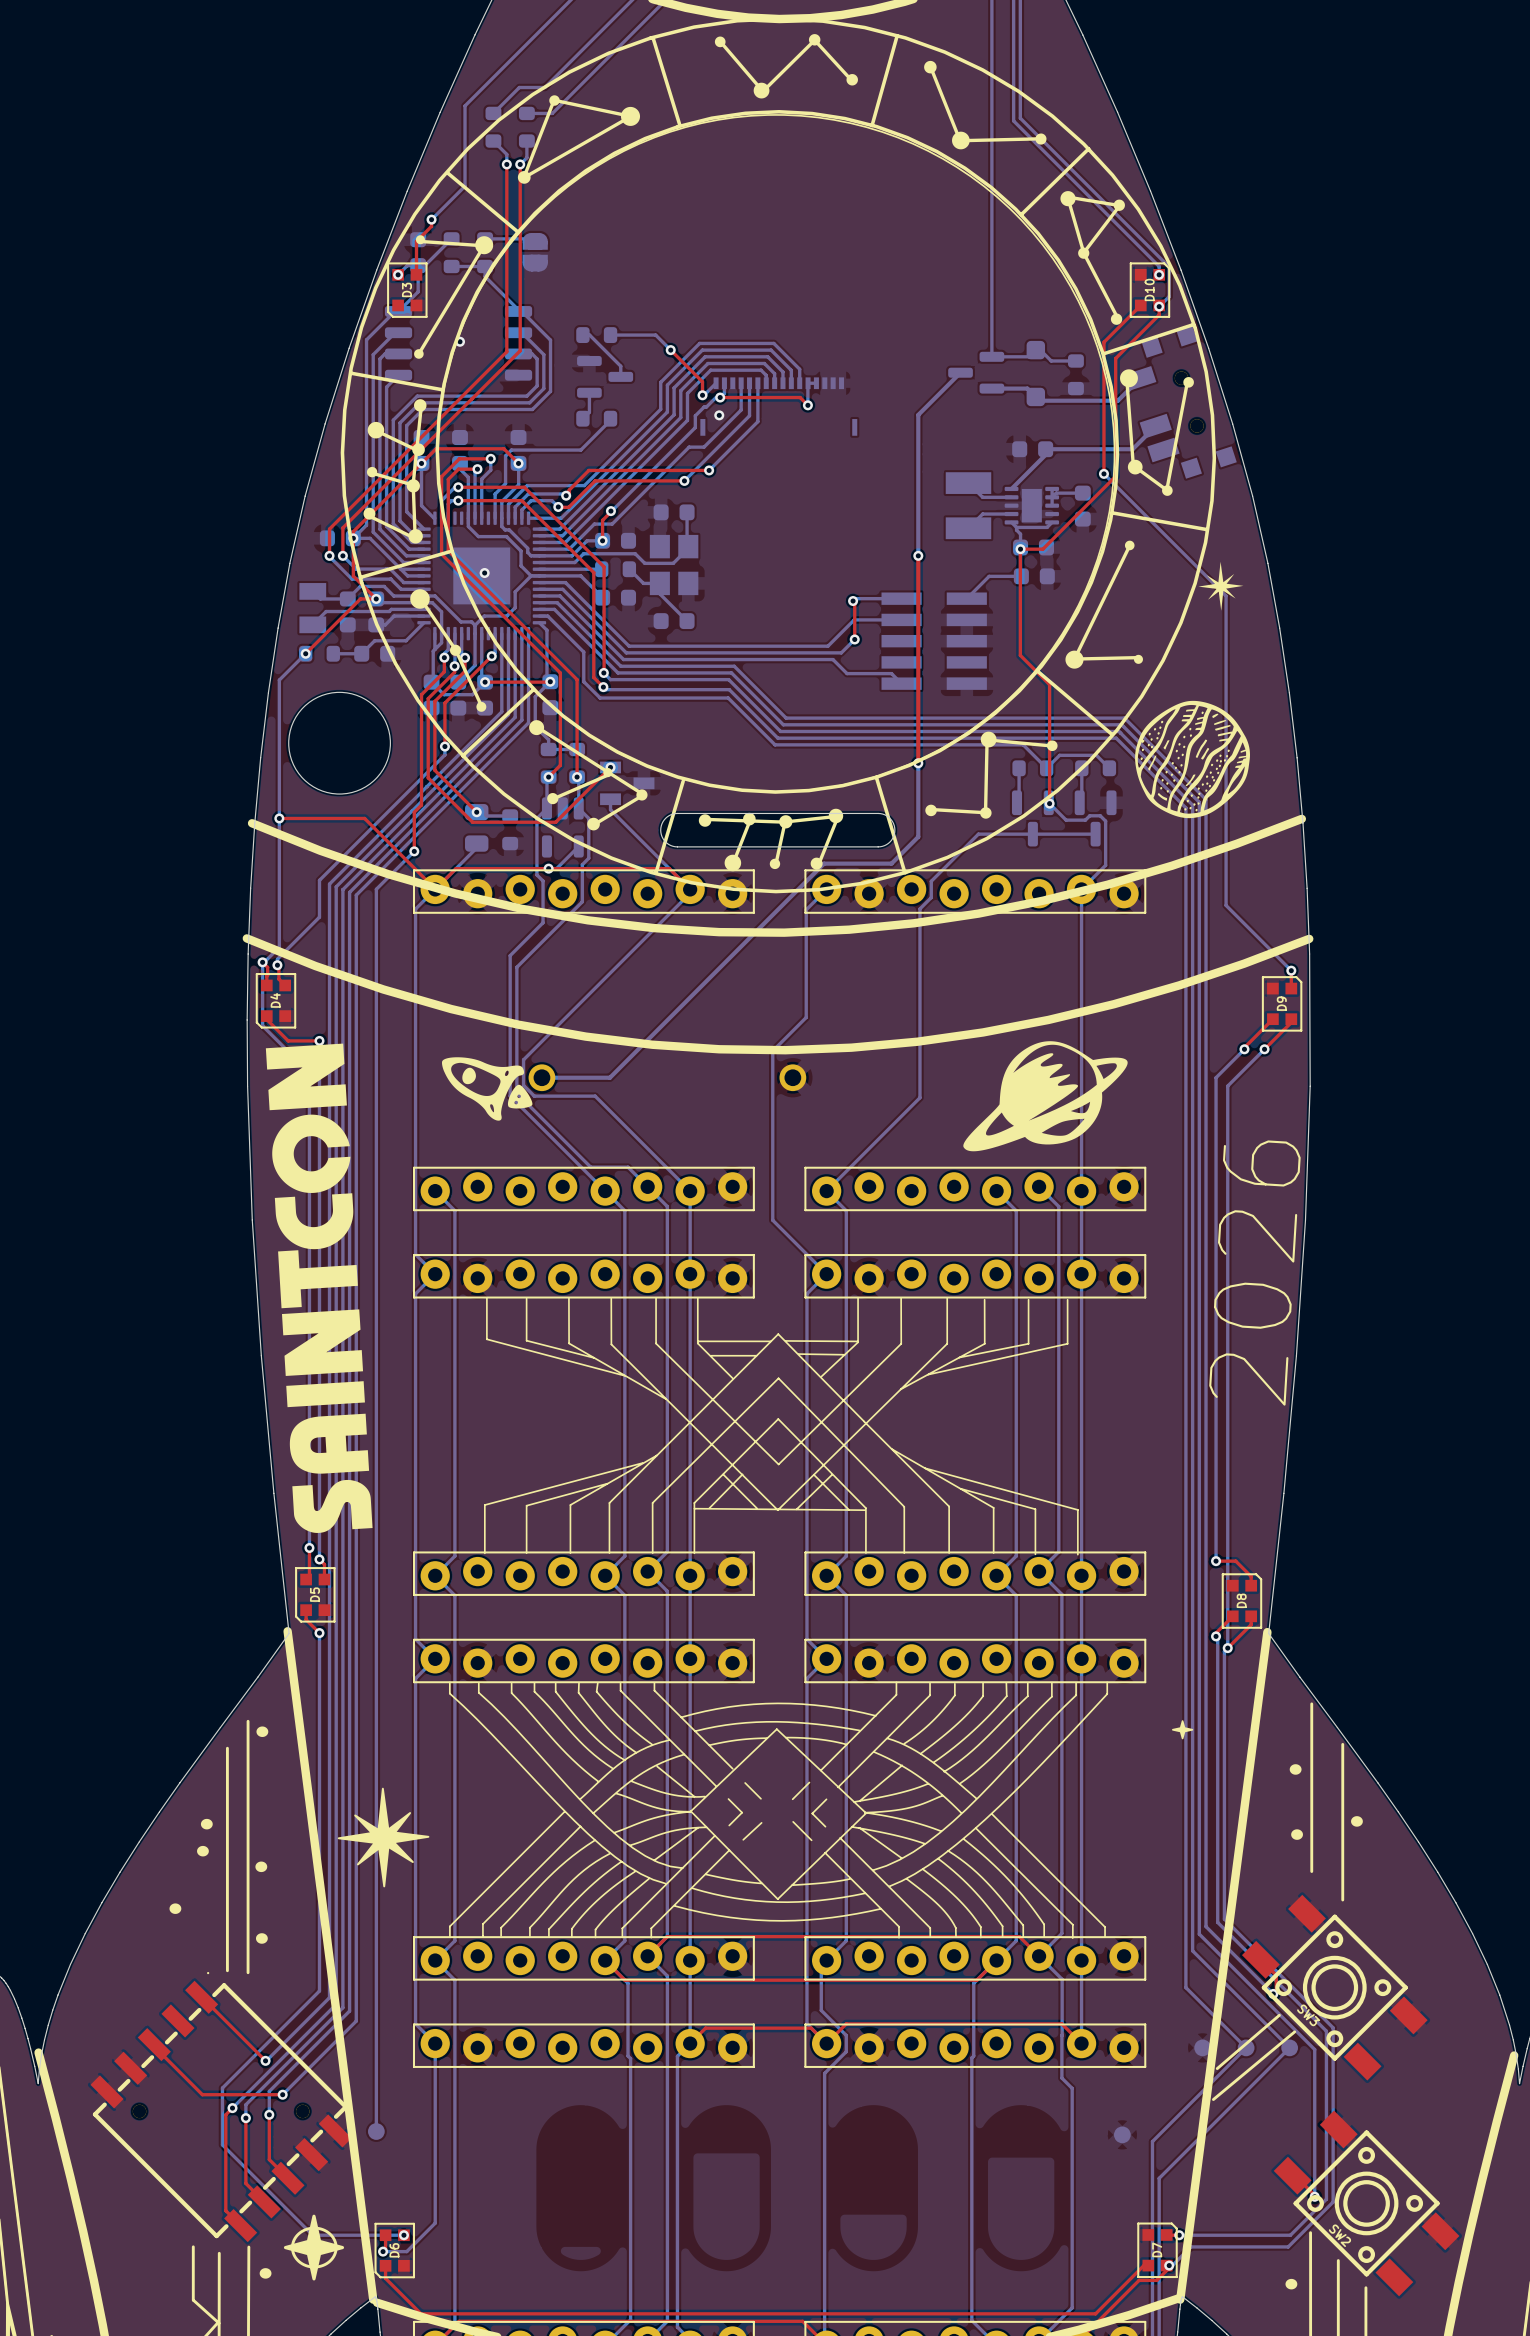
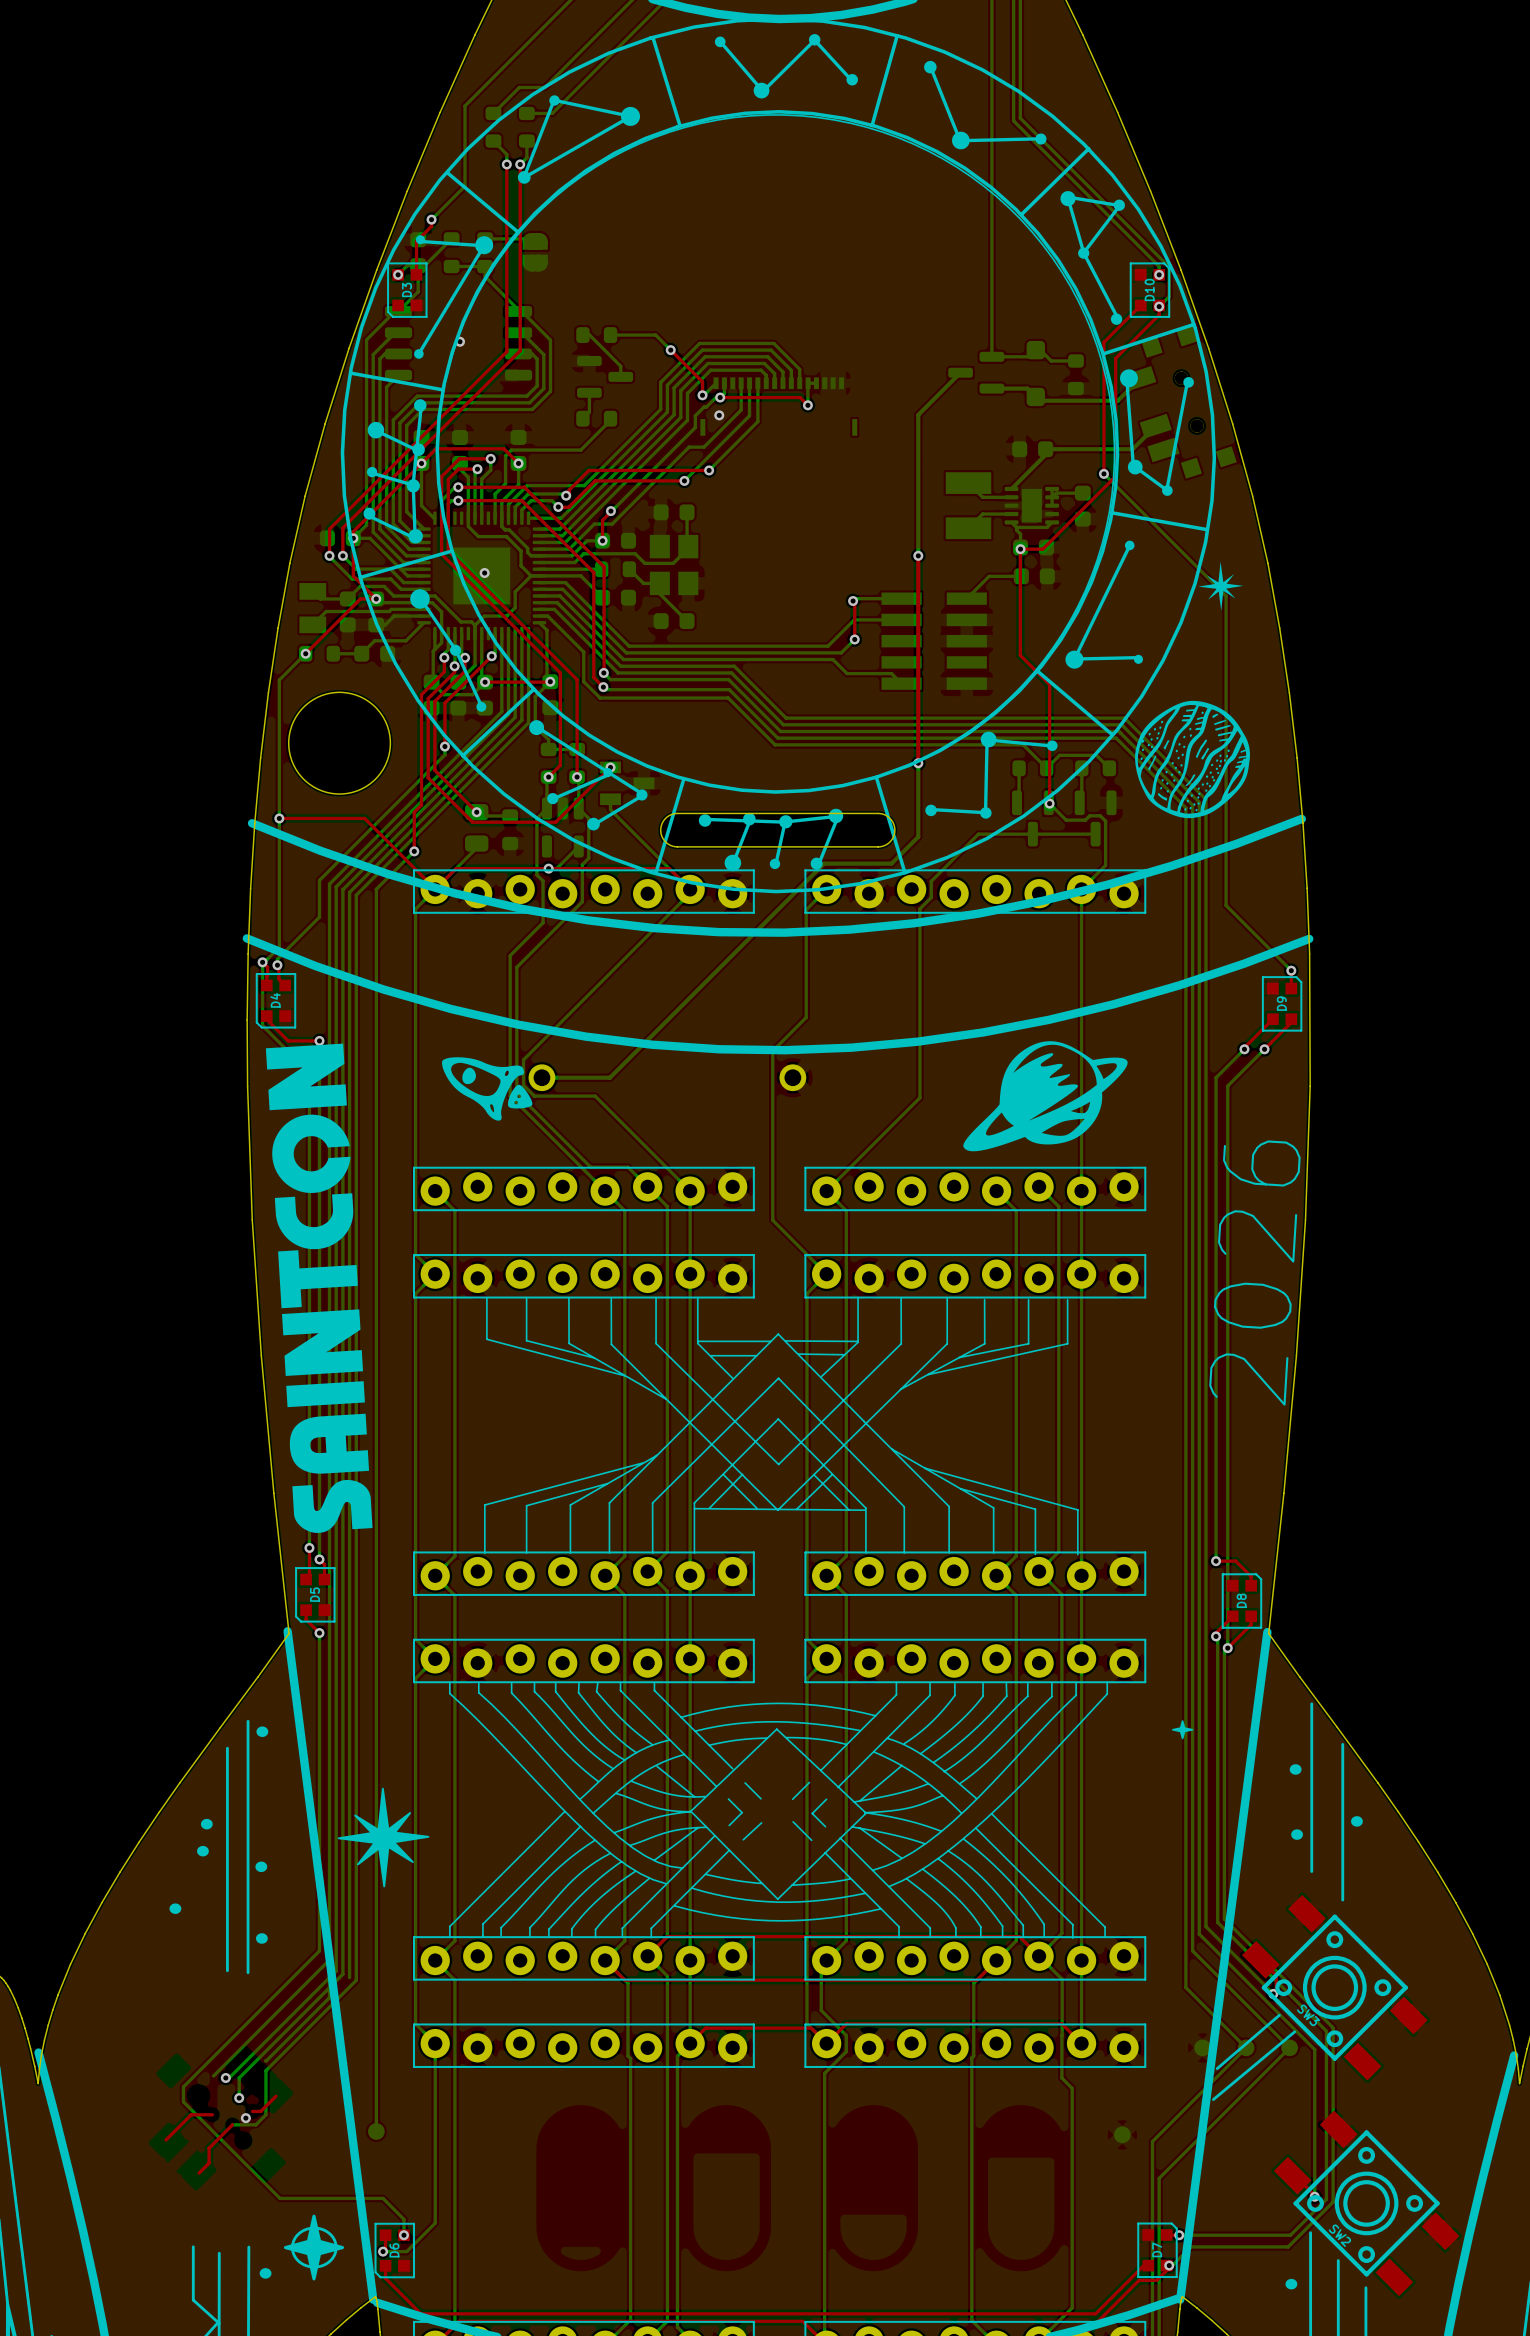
bottom track: (319, 1950) (319, 1991) (222, 2088) (222, 2144) (312, 2235) (403, 2235) -> (319, 1950) (183, 2086) (183, 2101) (279, 2198) (383, 2198) (403, 2219) (403, 2235)
bottom track: none -> (329, 1960) (213, 2076)
bottom track: (336, 1970) (336, 2004) (232, 2108) -> (336, 1970) (229, 2077) (225, 2077)
bottom track: (342, 1974) (342, 2007) (245, 2104) (245, 2118) -> (342, 1974) (239, 2077) (239, 2098)
bottom track: (349, 1977) (349, 2011) (269, 2091) (269, 2114) -> none
bottom track: (356, 1980) (356, 2021) (282, 2094) -> (356, 1980) (265, 2070) (265, 2114) (255, 2124) (232, 2124)
top track: (201, 1997) (265, 2060) -> none
top track: (154, 2044) (202, 2094) (282, 2094) -> none
via: (265, 2060) -> none
via: none -> (225, 2077)
via: (282, 2094) -> none
top track: none -> (275, 2096) (260, 2111) (252, 2111)
part: (221, 2107) -> none
top track: (232, 2108) (225, 2114) (225, 2210) (240, 2225) -> none
via position: (232, 2108) -> (239, 2098)
top track: none -> (212, 2114) (191, 2114) (166, 2140)
top track: (269, 2114) (269, 2159) (287, 2178) -> none
via: (269, 2114) -> none
top track: (245, 2118) (245, 2183) (264, 2201) -> none
top track: none -> (232, 2124) (209, 2148) (209, 2163) (199, 2173)

